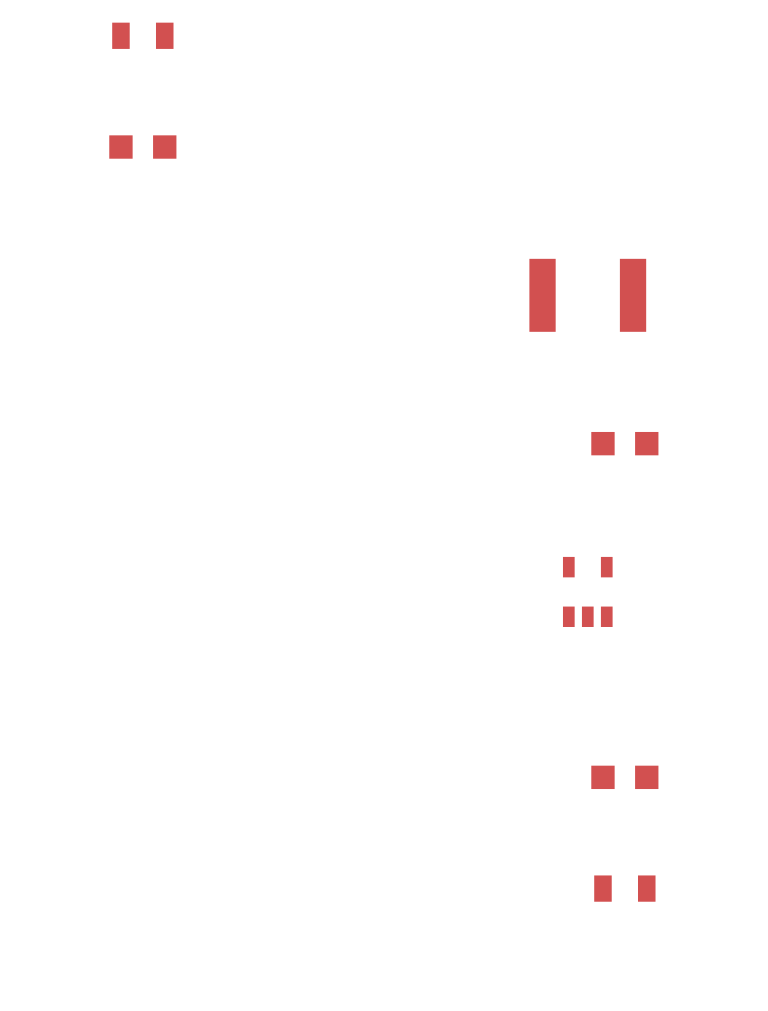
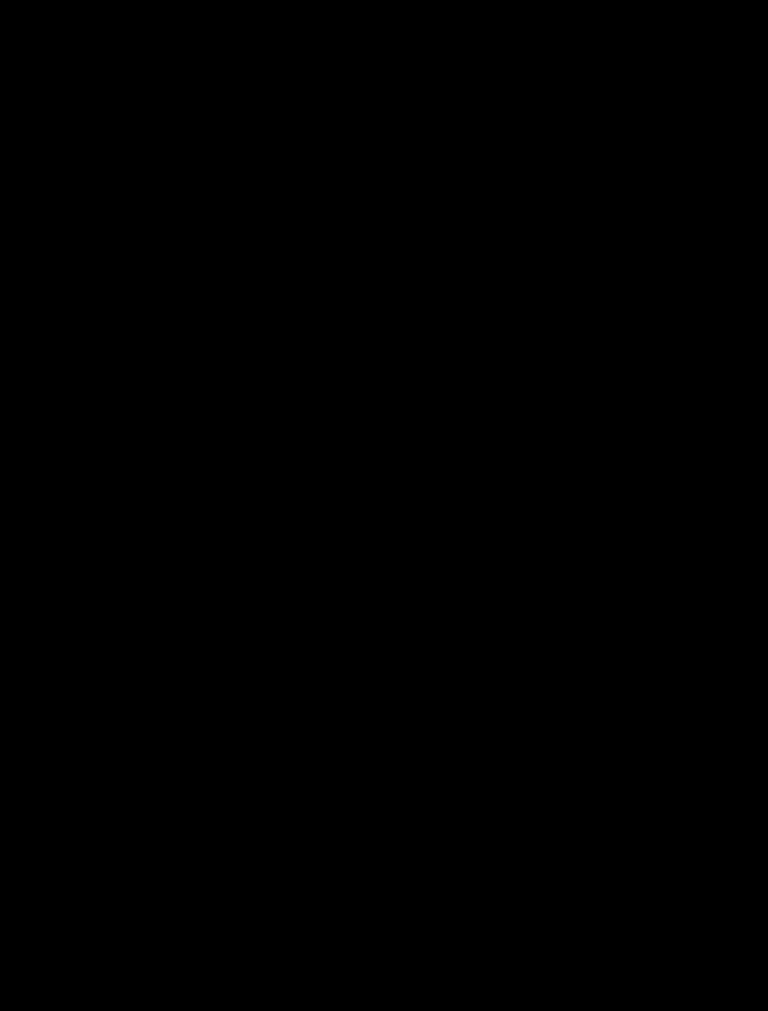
part: (142, 35) -> none
part: (142, 147) -> none
part: (587, 295) -> none
part: (624, 443) -> none
part: (587, 591) -> none
part: (624, 777) -> none
part: (624, 888) -> none

